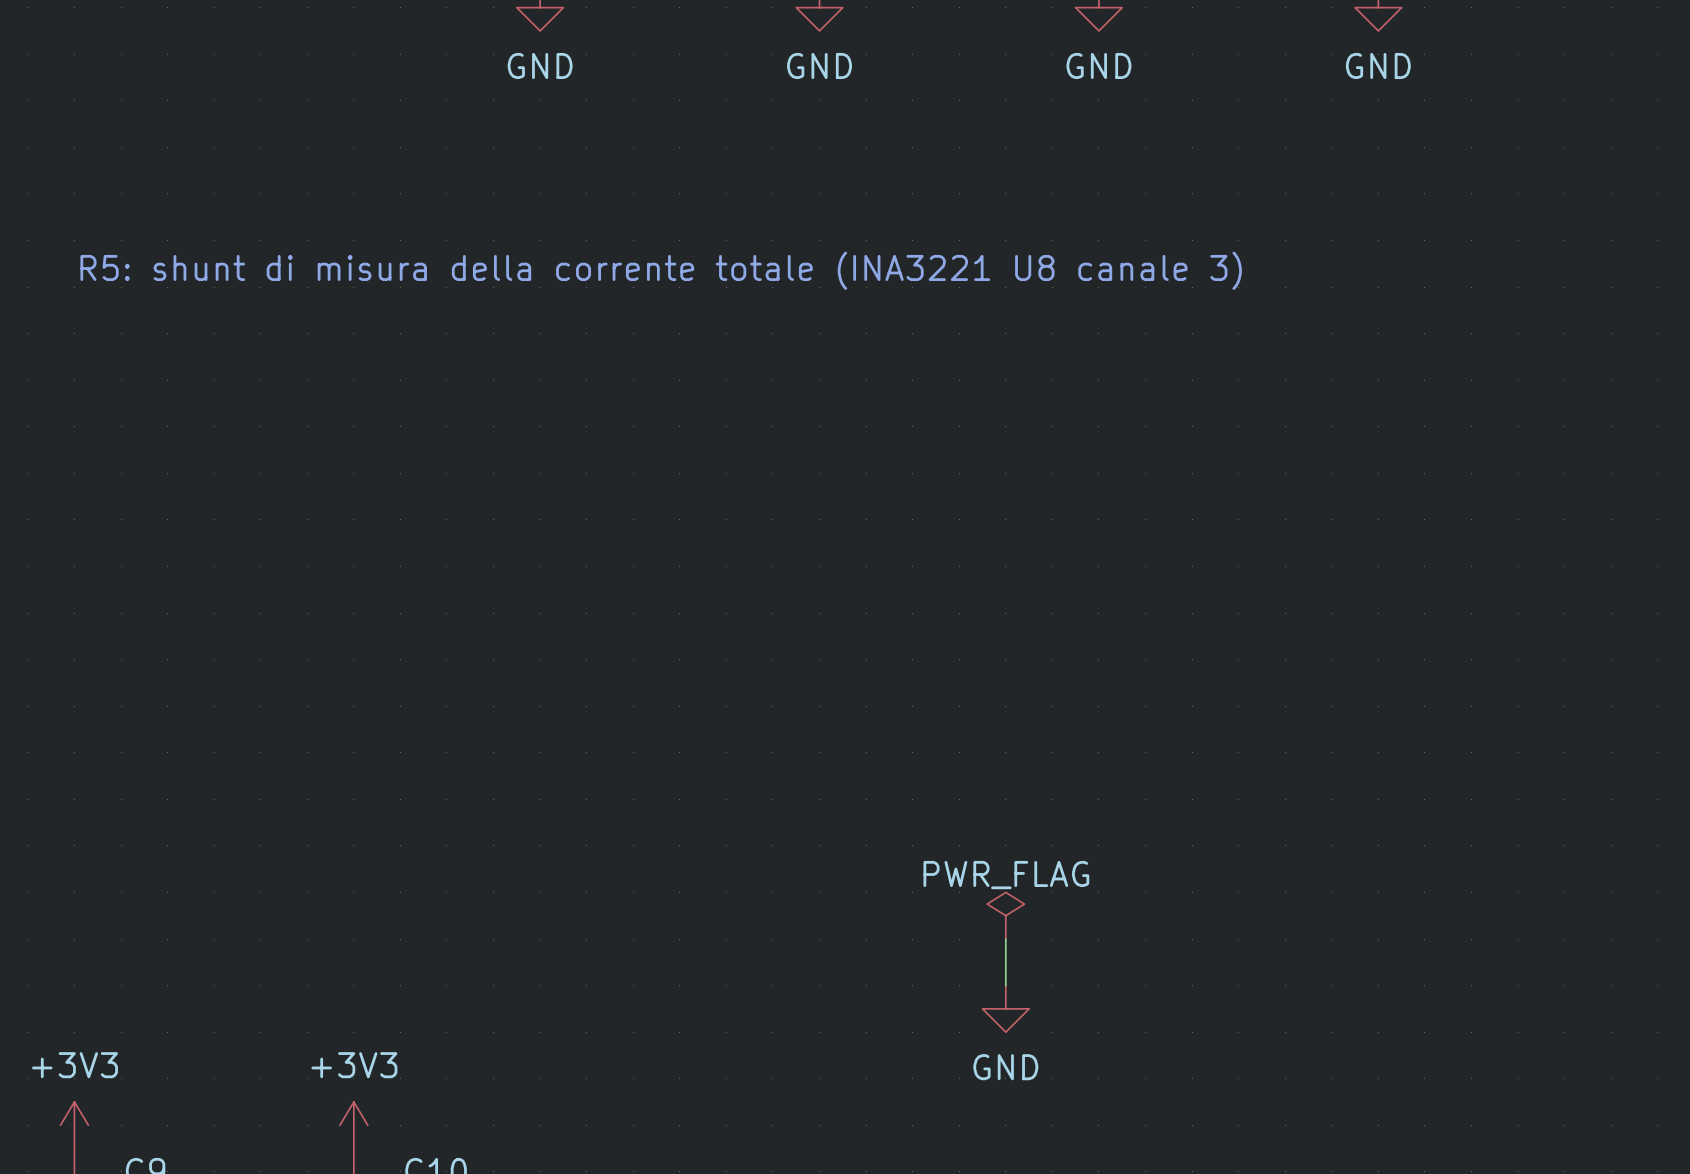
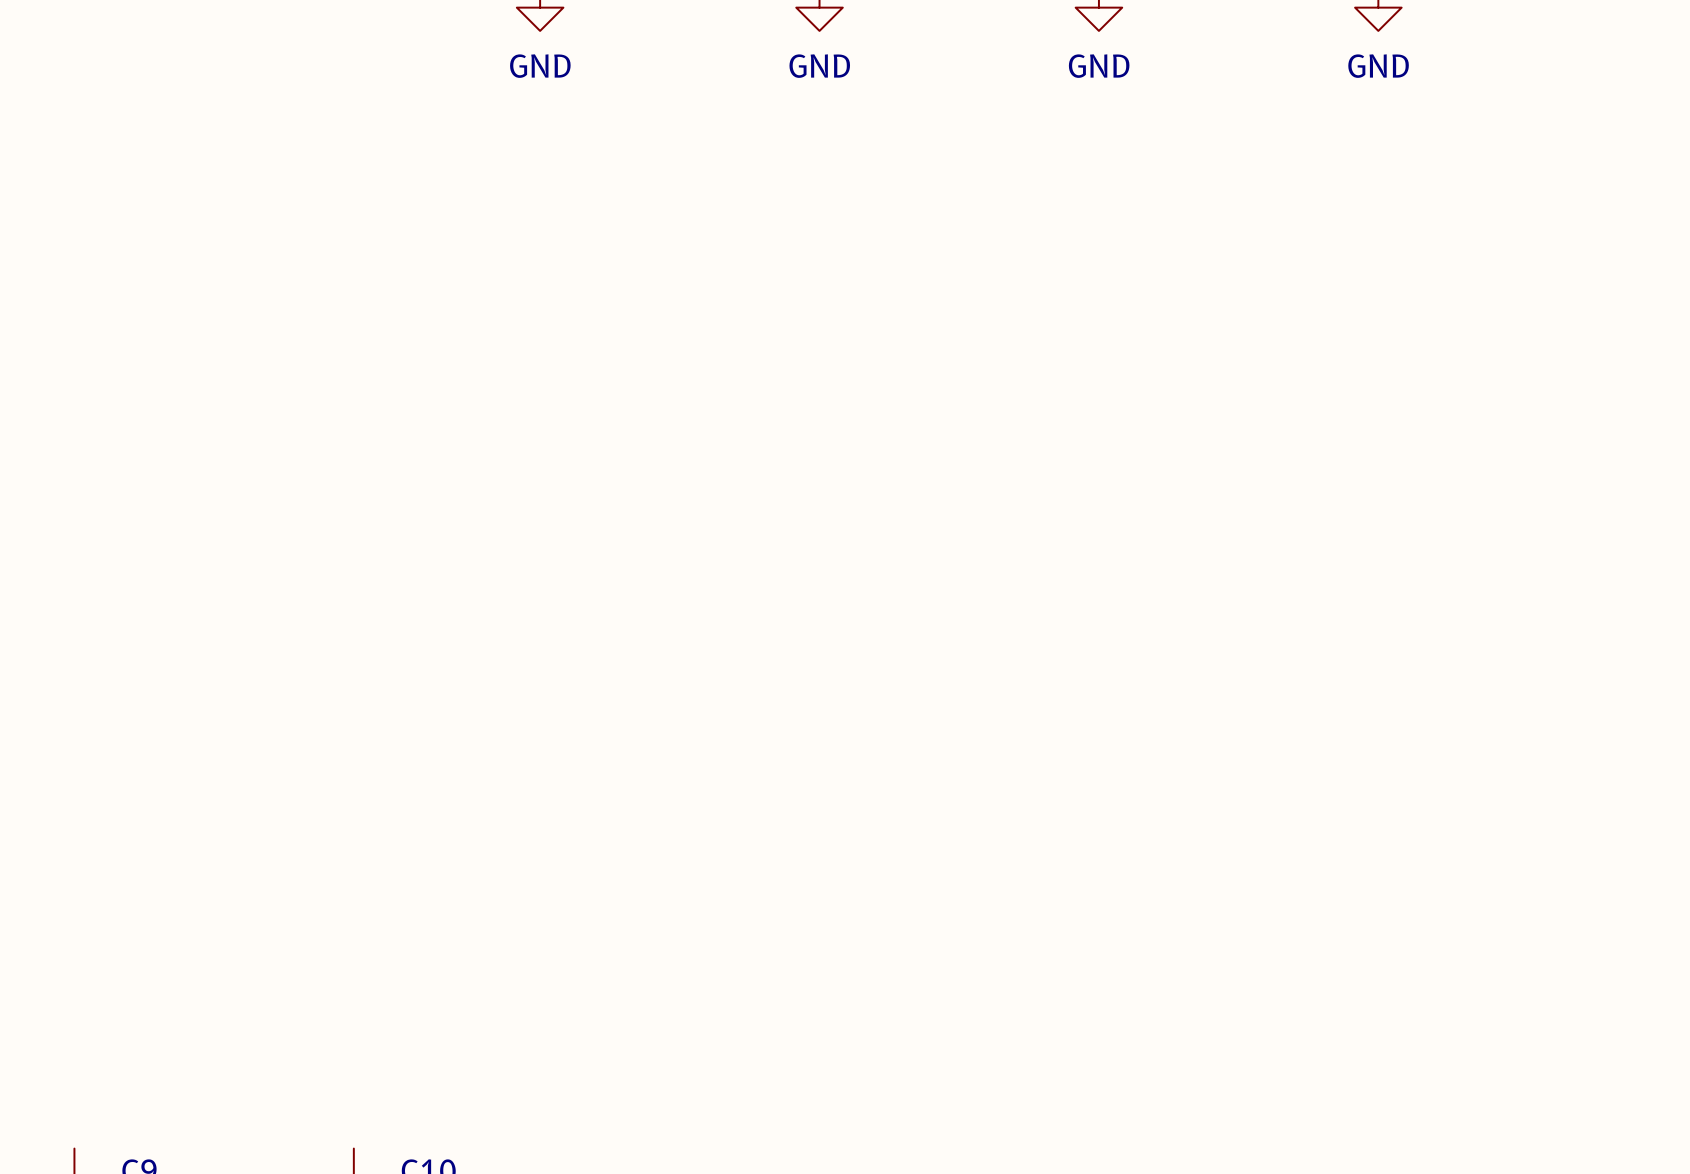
text: R5: shunt di misura della corrente totale (INA3221 U8 canale 3) (661, 270) -> none
power symbol: PWR_FLAG (1005, 915) -> none
wire: (1005, 939) (1005, 985) -> none
power symbol: GND (1005, 1008) -> none
power symbol: +3V3 (74, 1125) -> none
power symbol: +3V3 (353, 1125) -> none

